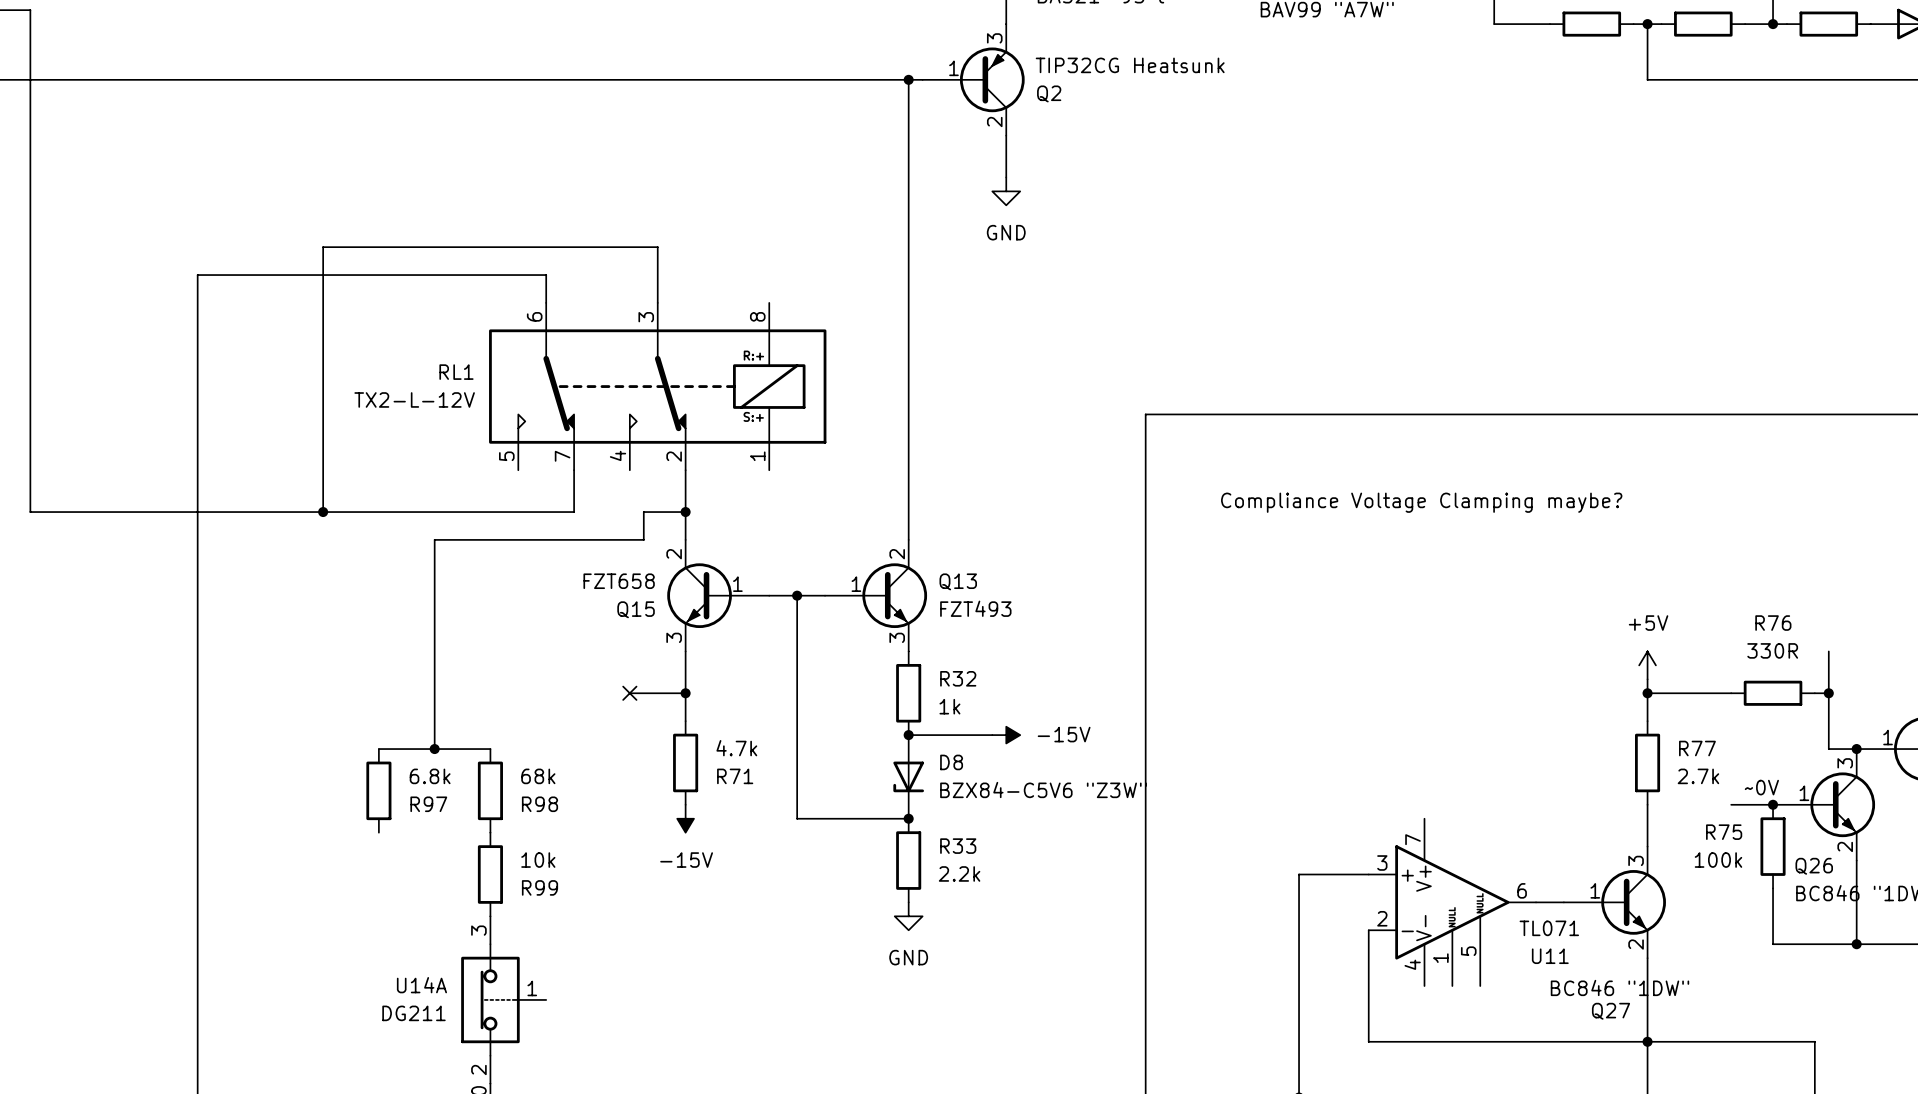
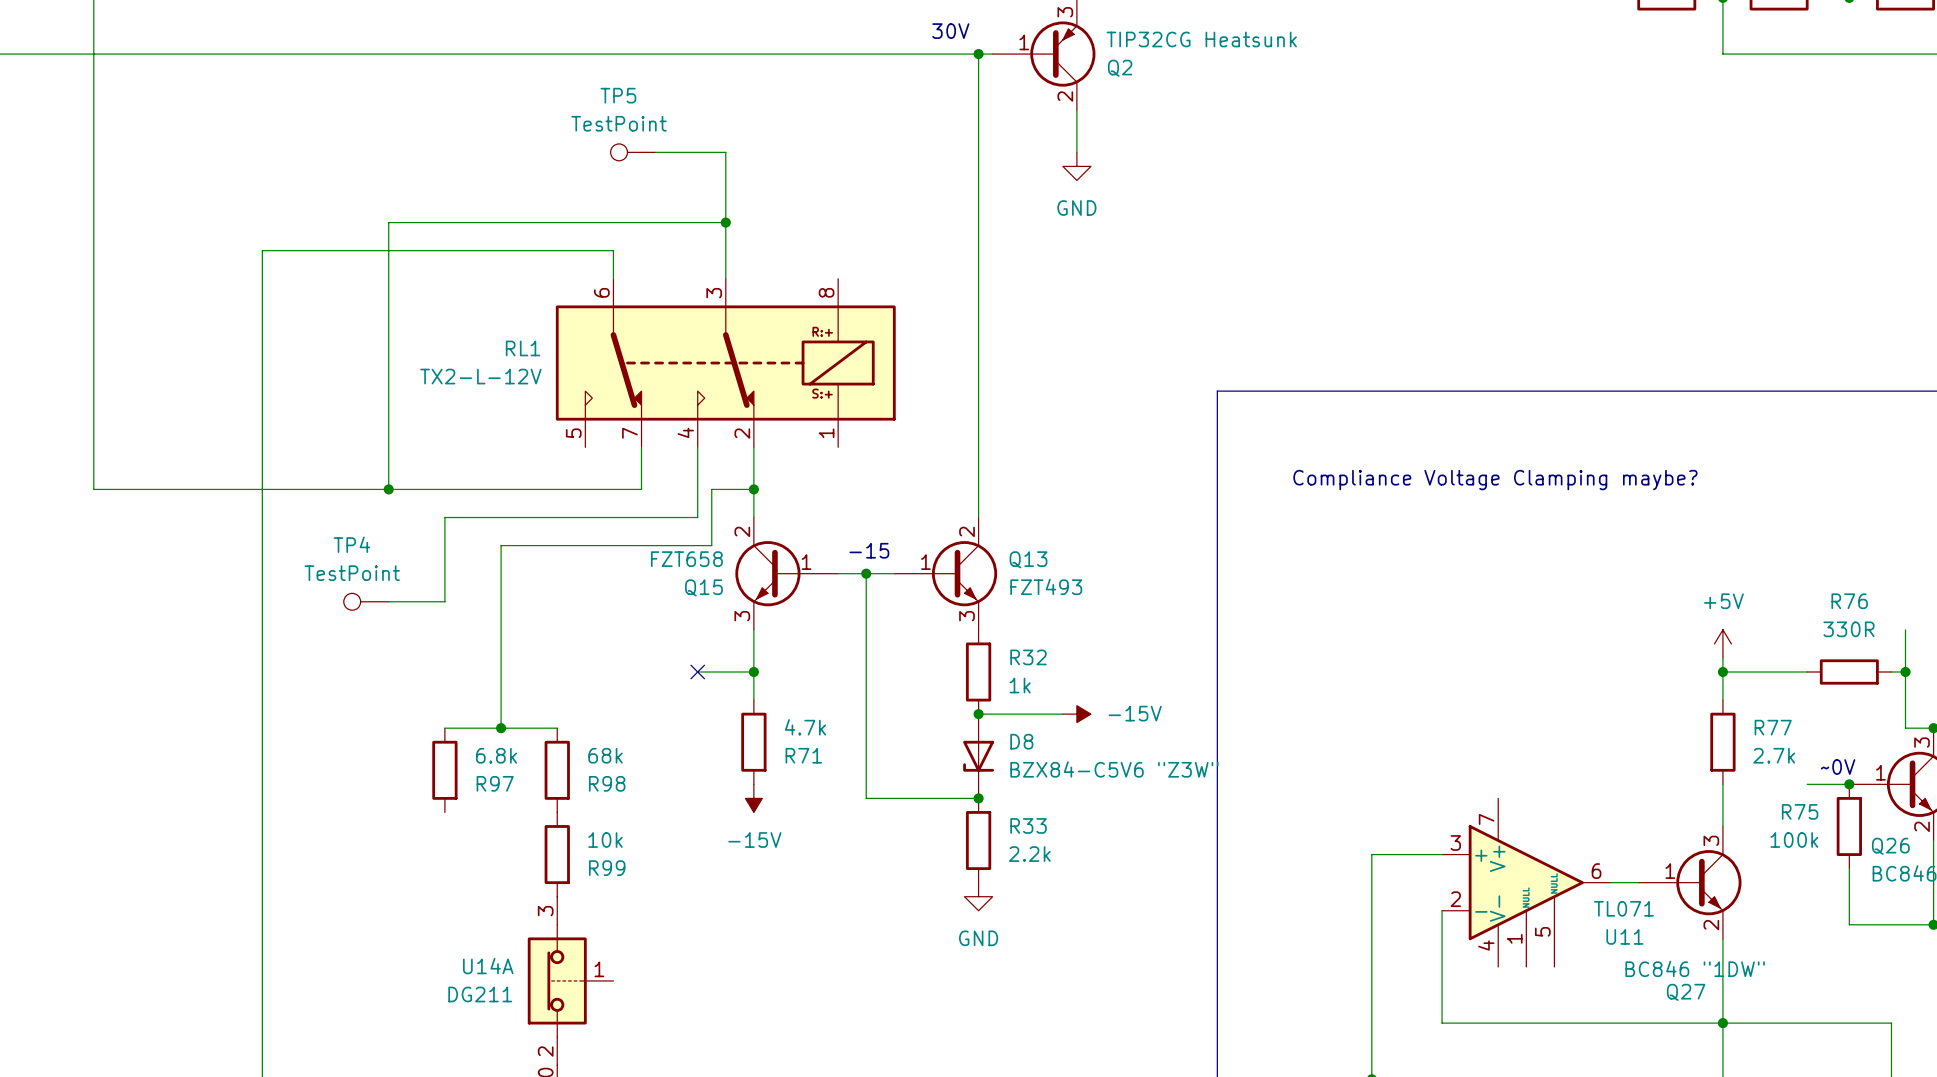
text: none -> 30V (950, 31)
TP5: none -> TestPoint (633, 152)
wire: none -> (655, 152) (725, 152) (725, 222)
junction: none -> (725, 222)
wire: (434, 539) (434, 567) -> (501, 517) (444, 517) (444, 601) (388, 601)
wire: (629, 539) (643, 539) -> (697, 517) (697, 447)
wire: none -> (711, 517) (711, 545) (501, 545)
text: none -> -15 (869, 550)
TP4: none -> TestPoint (366, 601)

